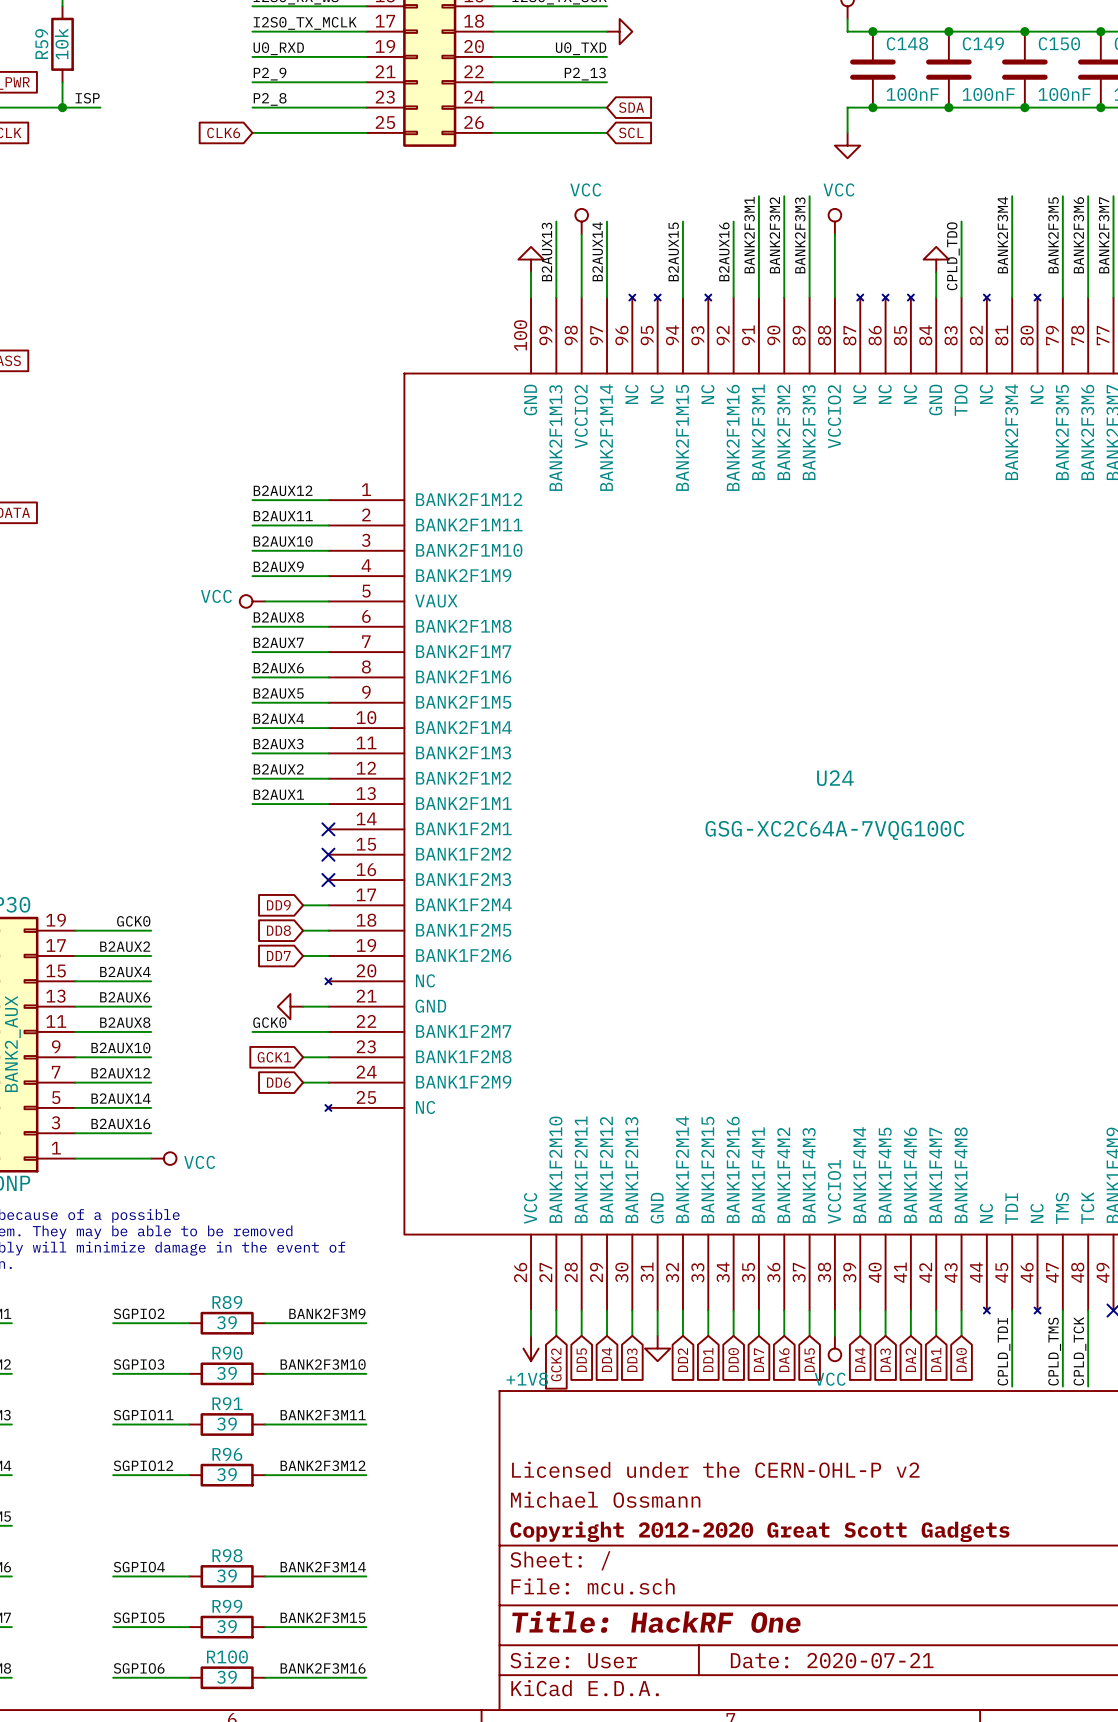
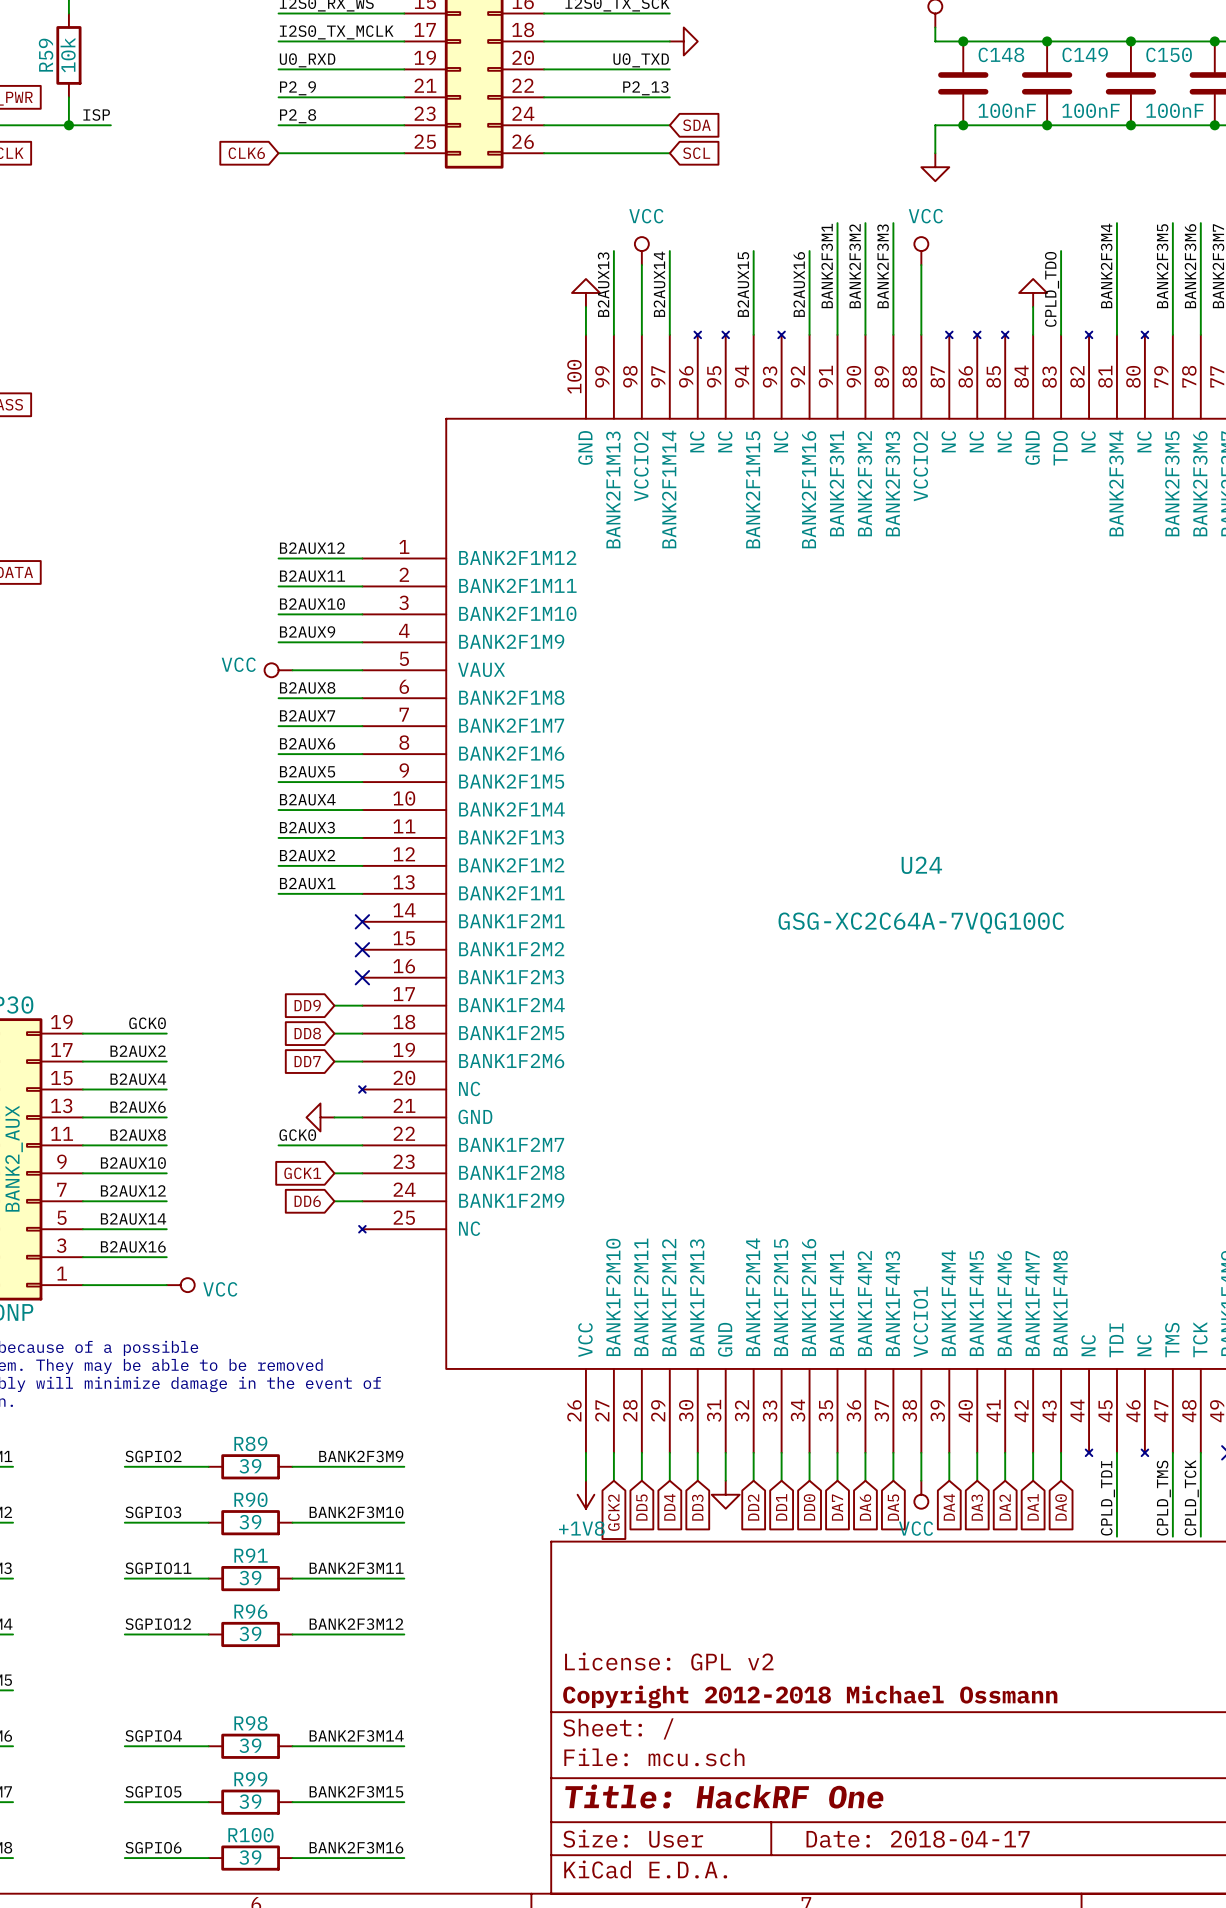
title block: Licensed under the CERN-OHL-P v2 (715, 1469) -> none
title block: Michael Ossmann (605, 1499) -> License: GPL v2 (669, 1661)
title block: Copyright 2012-2020 Great Scott Gadgets (759, 1531) -> Copyright 2012-2018 Michael Ossmann (810, 1696)
title block: Date: 2020-07-21 (832, 1660) -> Date: 2018-04-17 (918, 1839)

